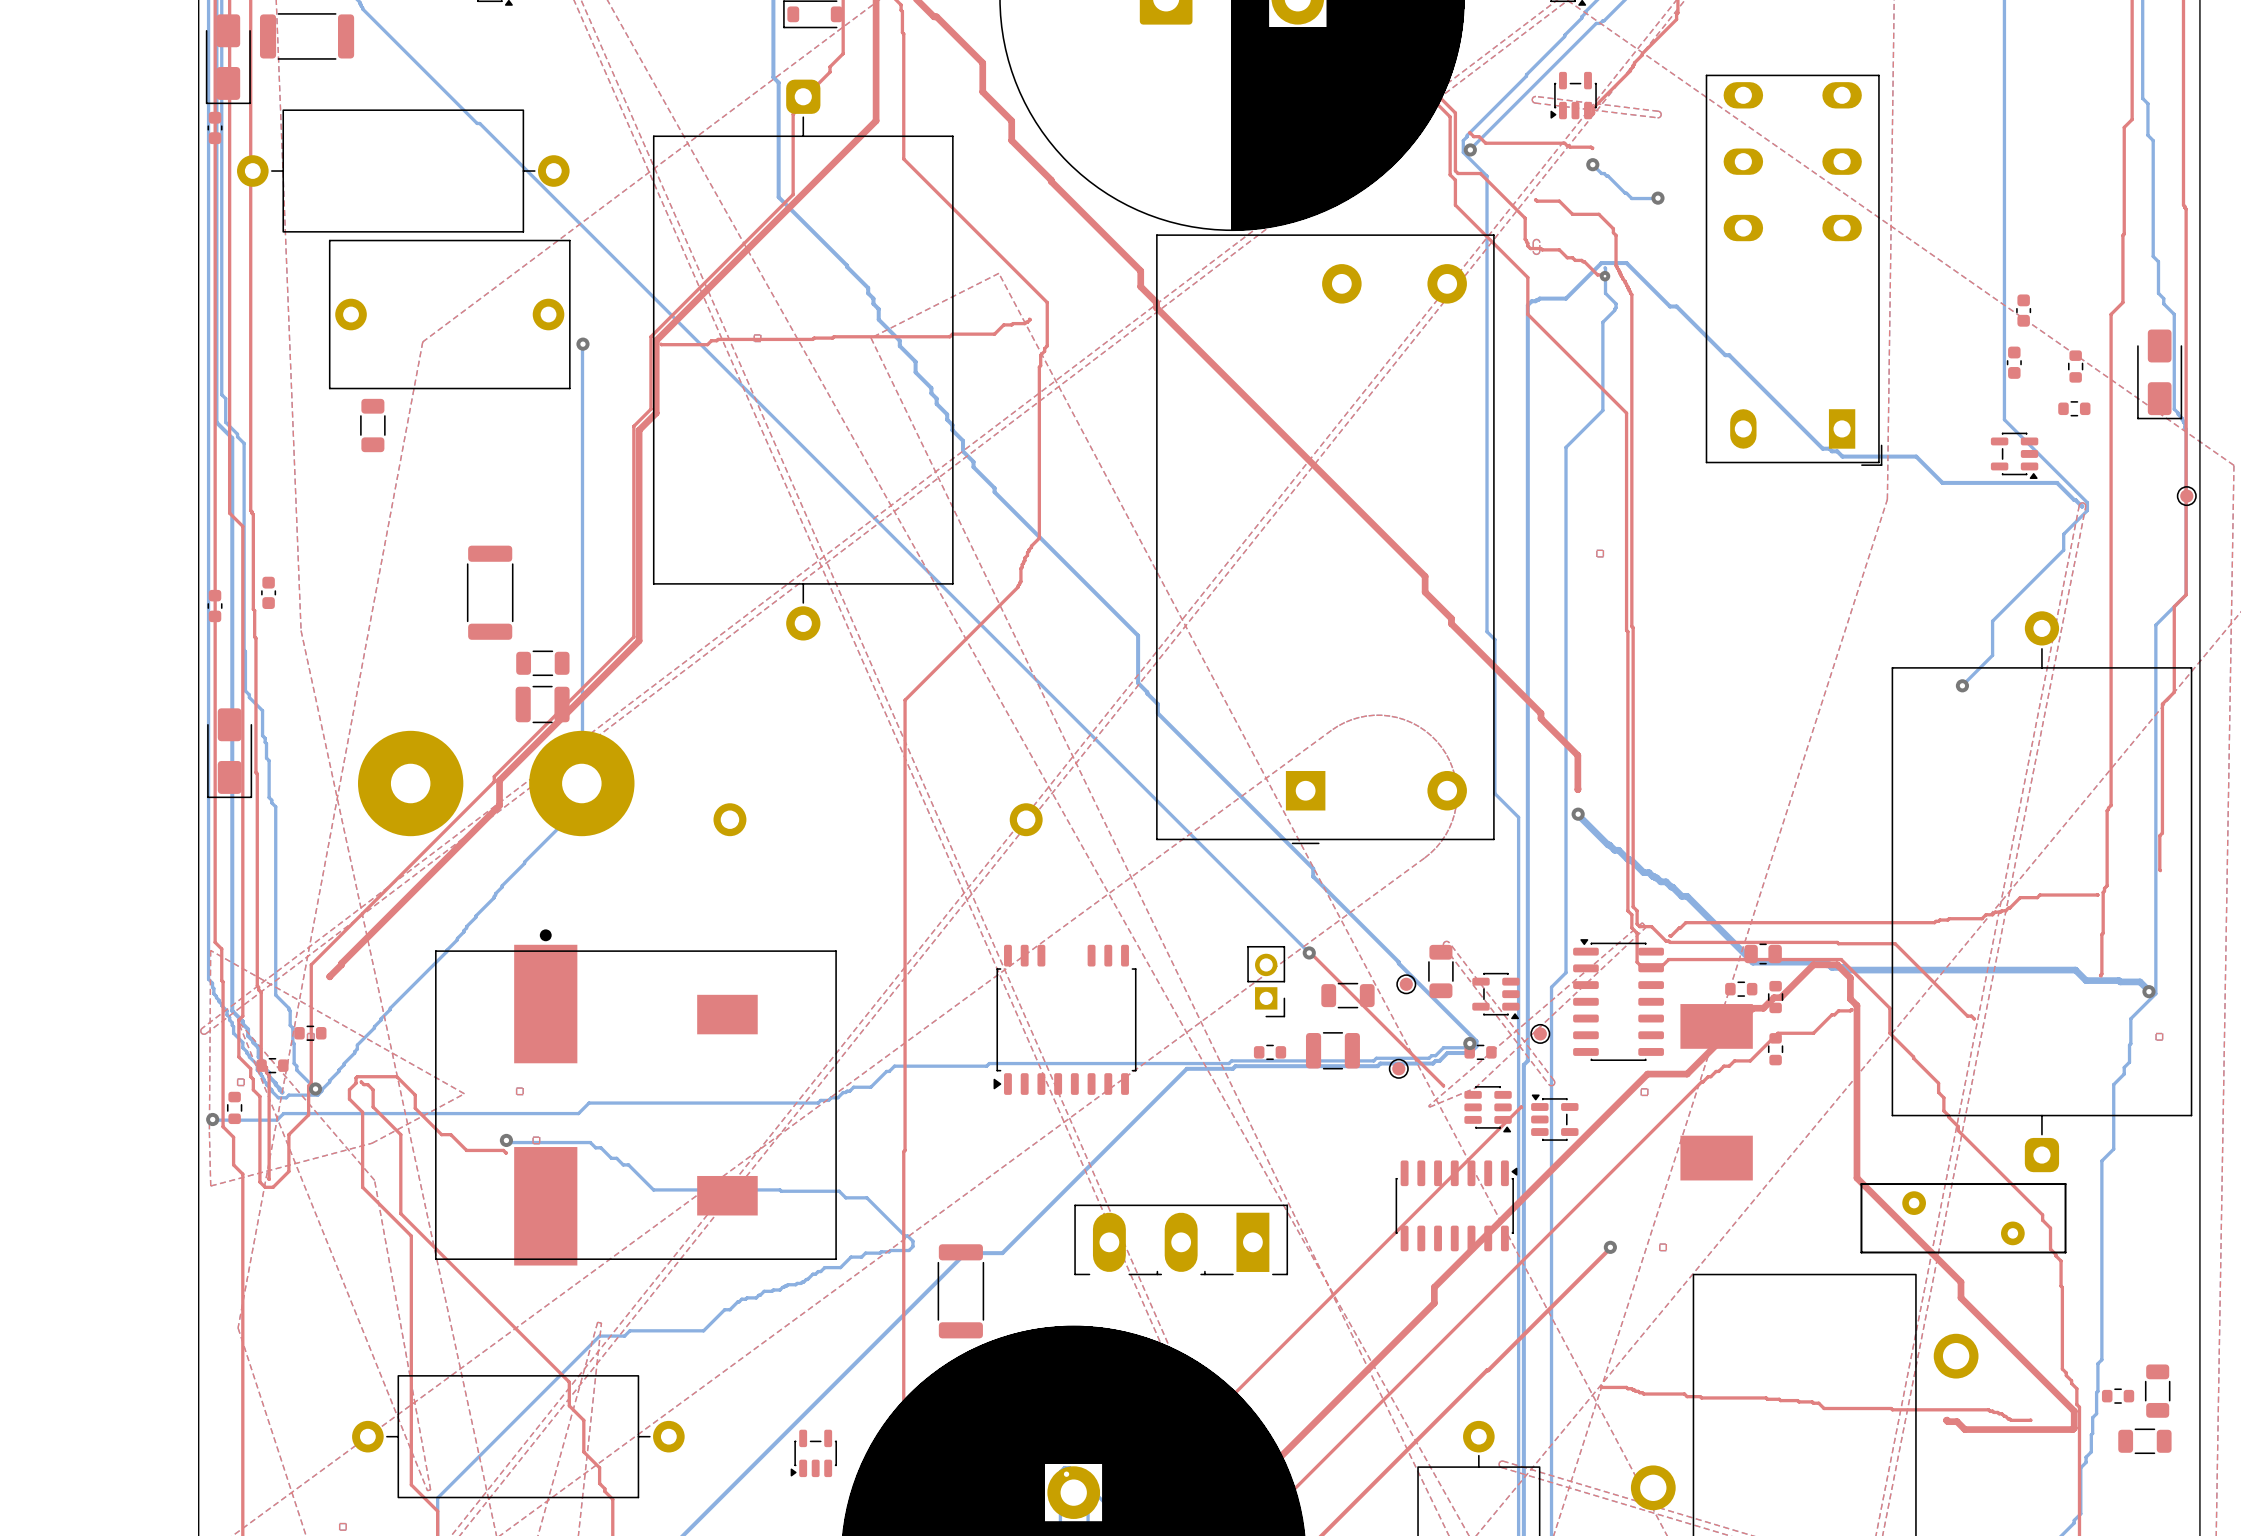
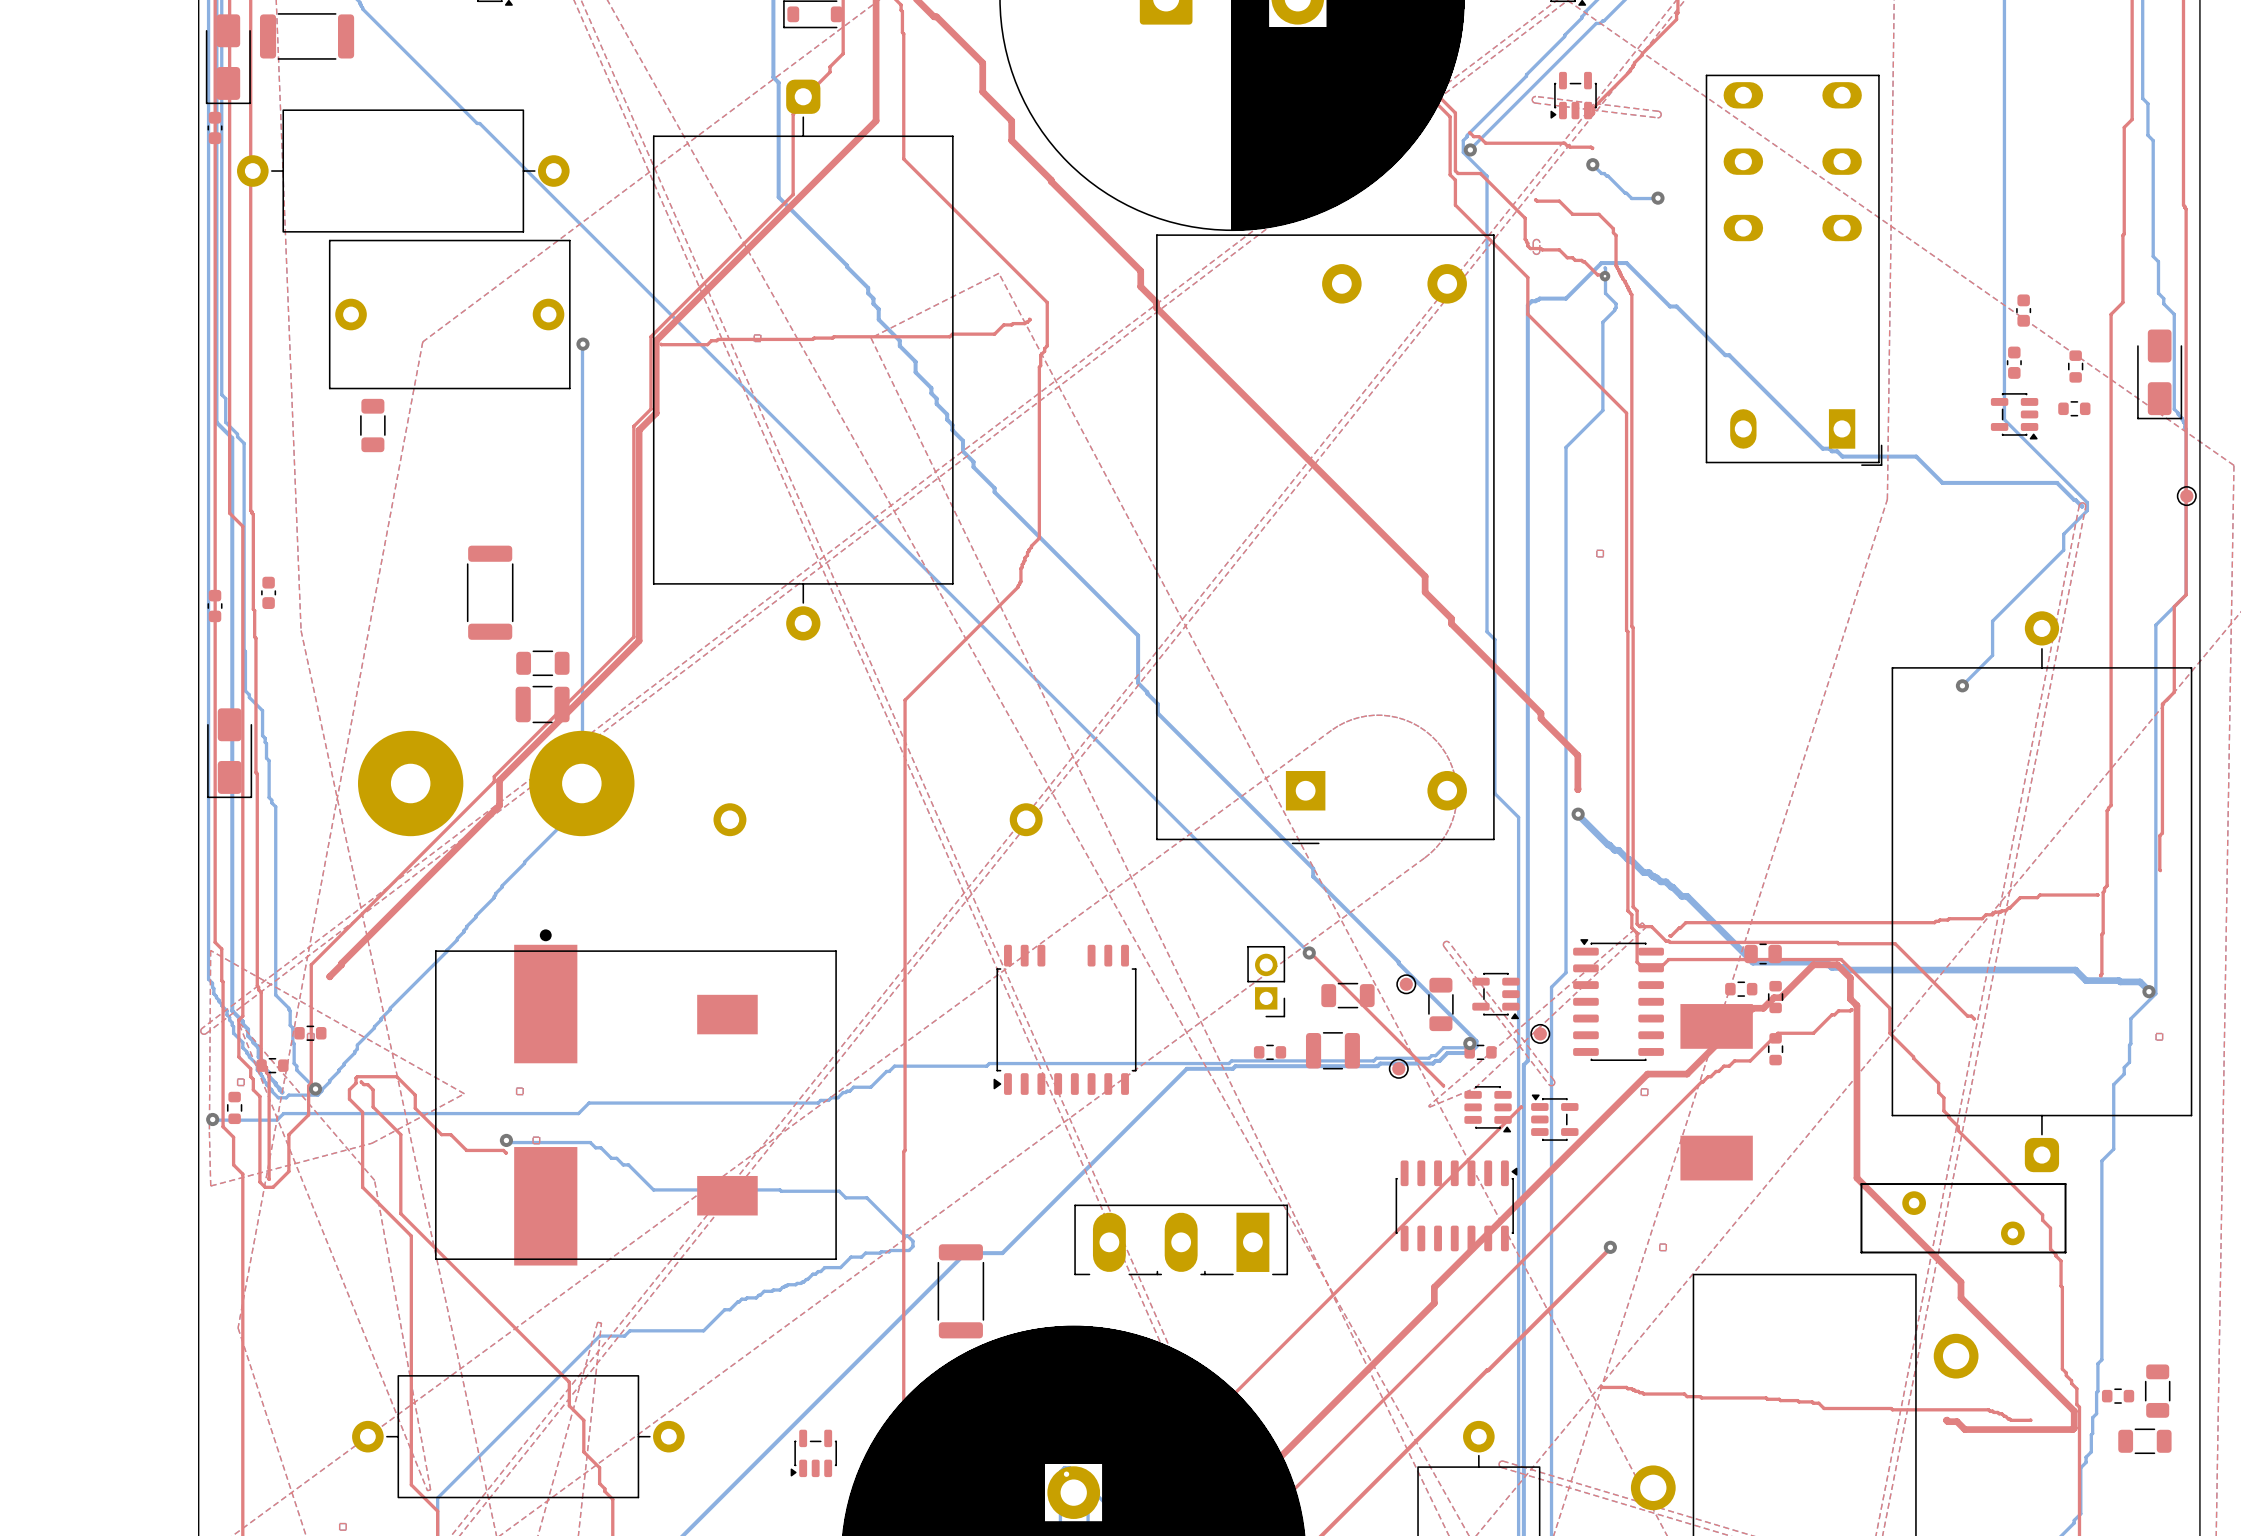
part position: (2014, 455) -> (2014, 416)
part position: (1440, 971) -> (1440, 1004)

